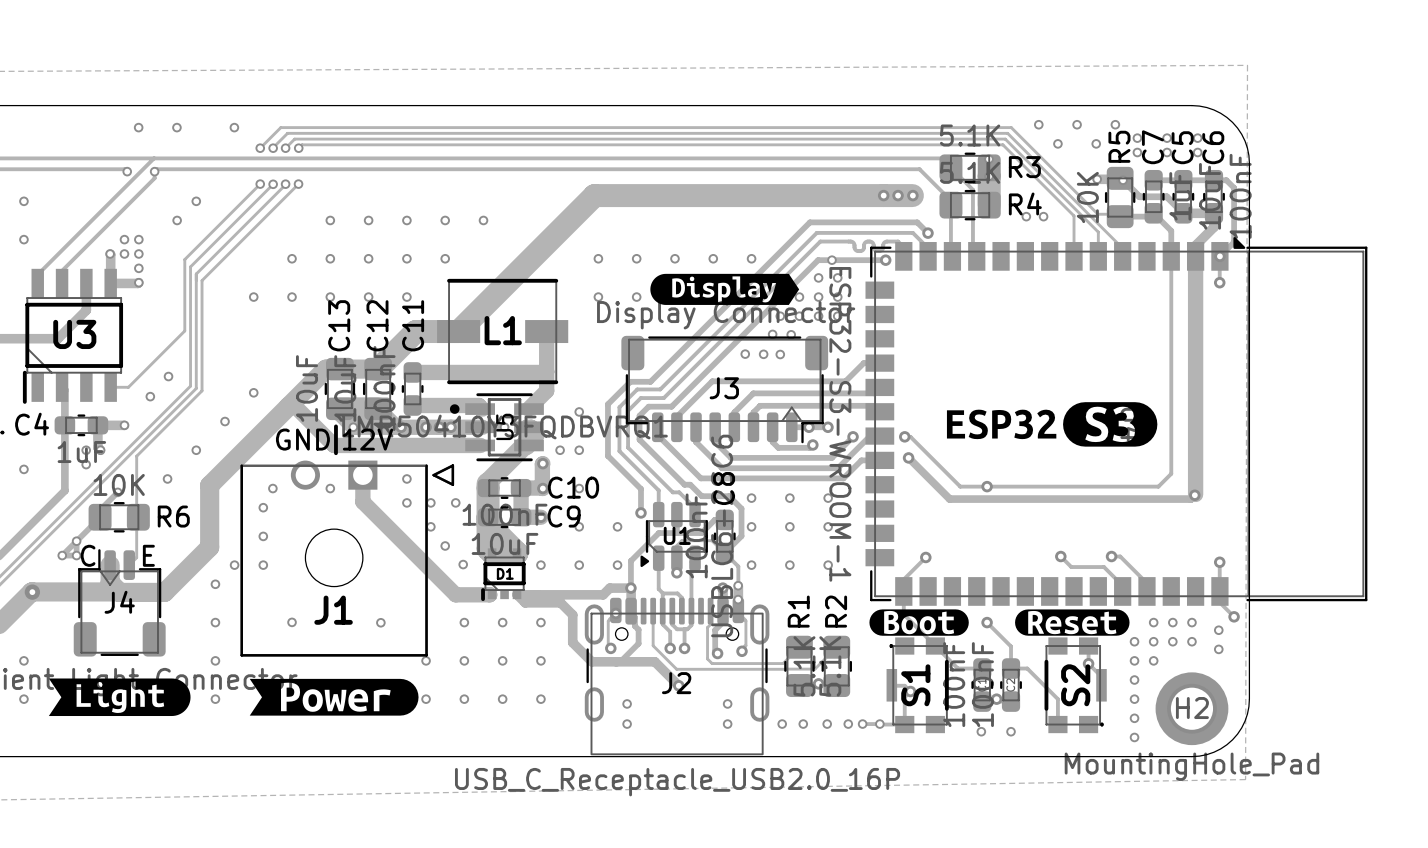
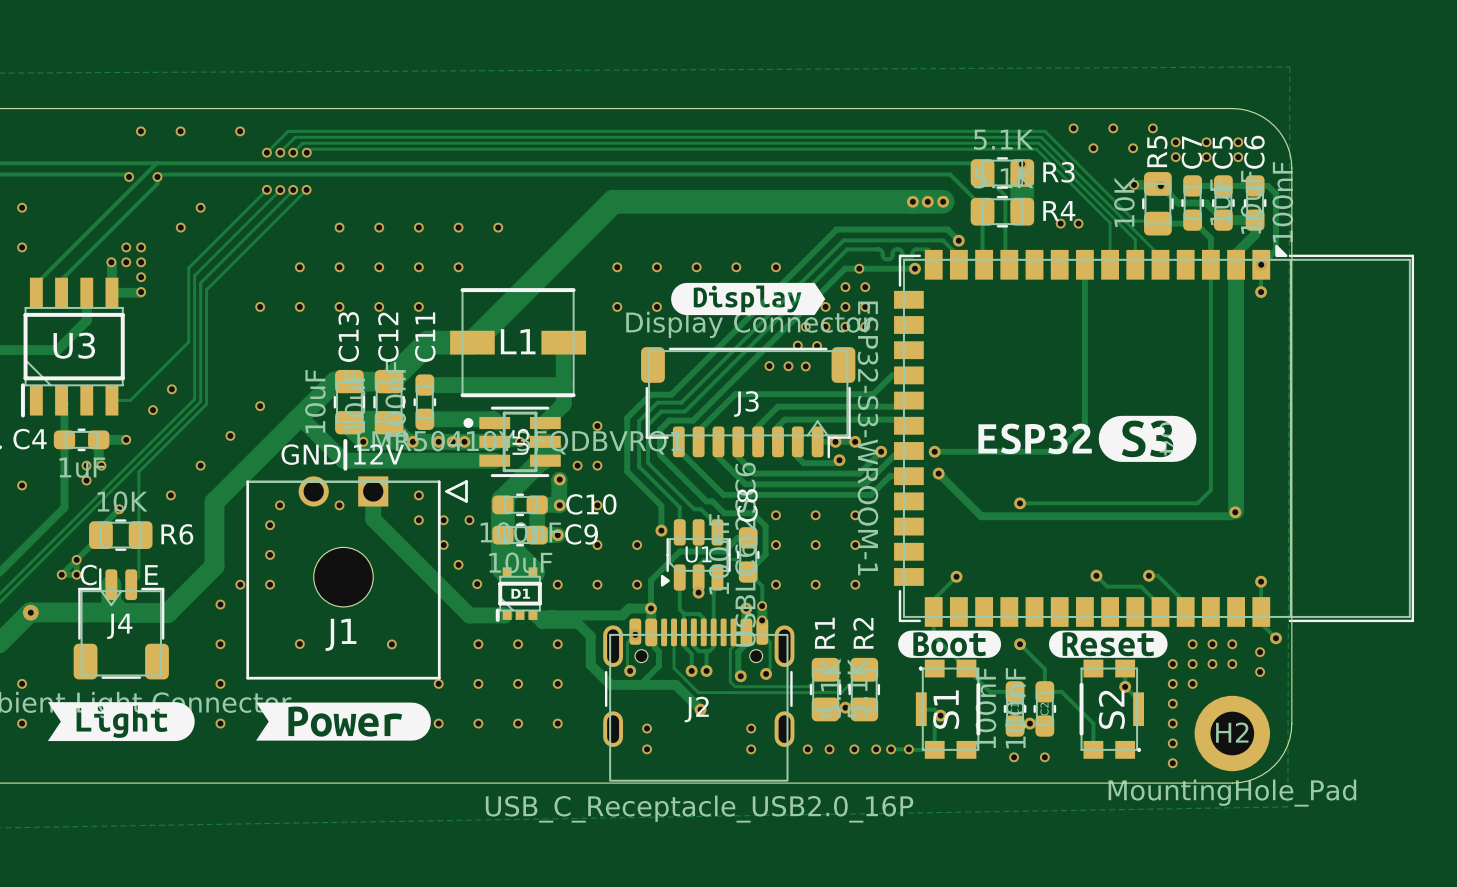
track: (910, 436) (960, 486) (987, 486) -> (940, 451) (1057, 451) (1084, 424) (1084, 264)

